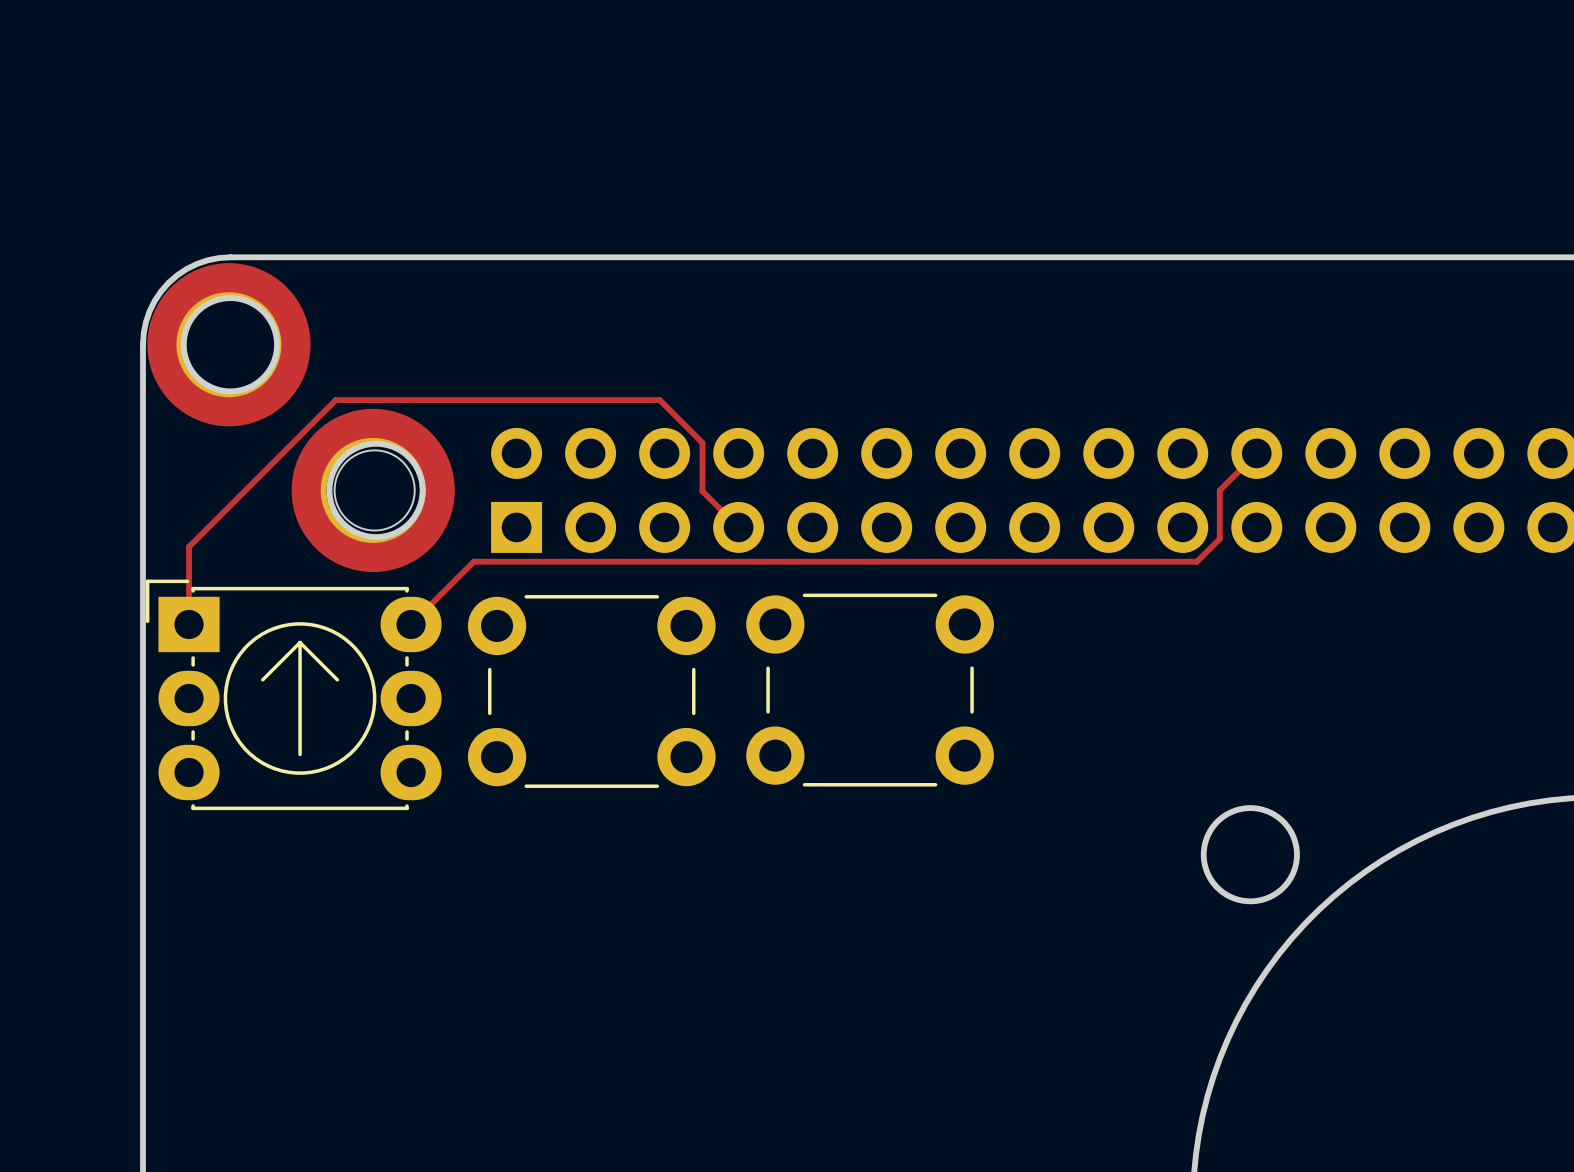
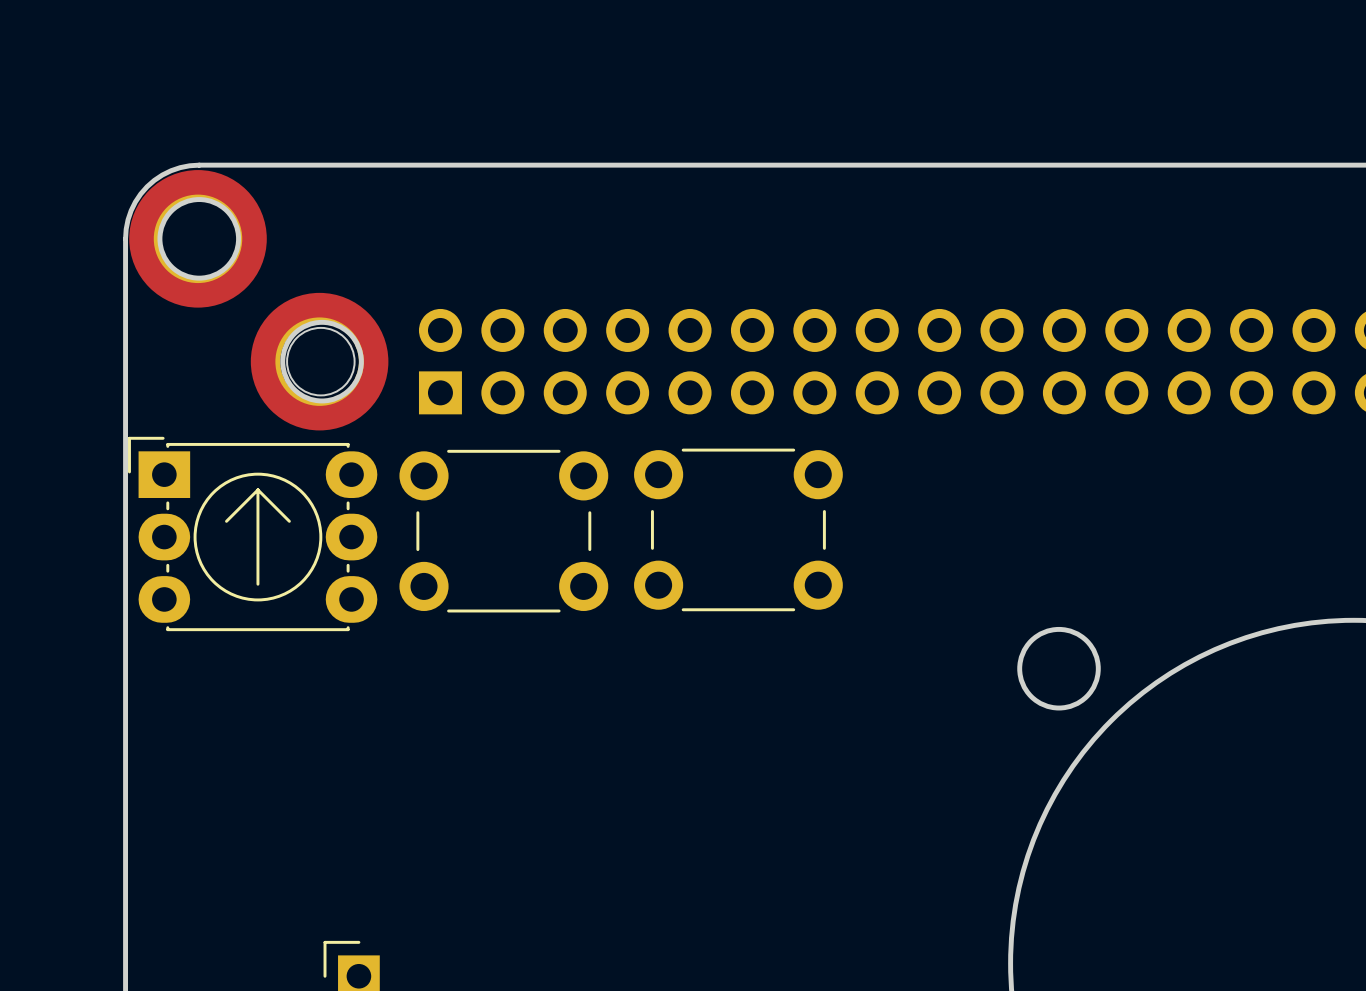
track: (1256, 453) (1219, 490) (1219, 538) (1196, 561) (473, 561) (411, 624) -> none
track: (738, 527) (702, 491) (702, 442) (659, 400) (335, 400) (189, 546) (189, 624) -> none

